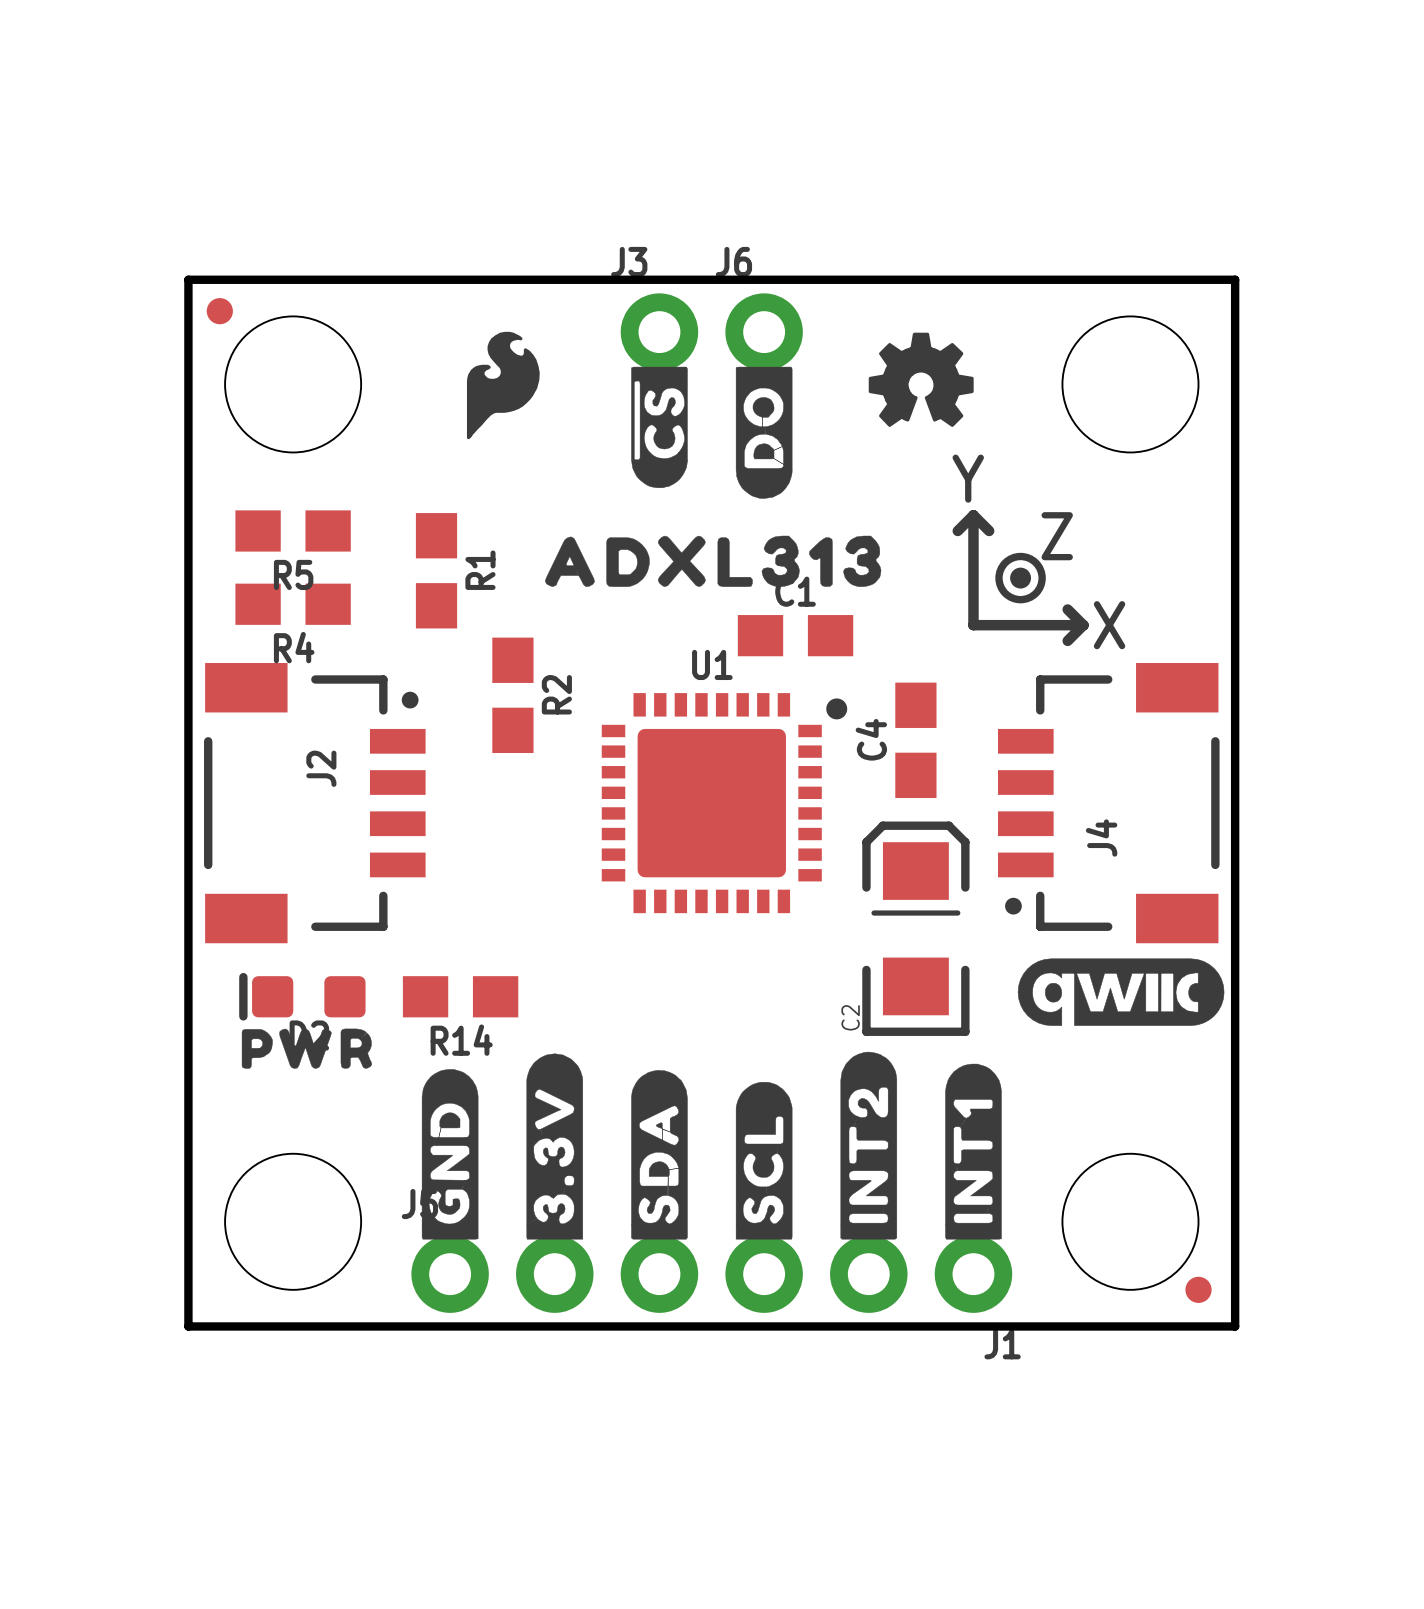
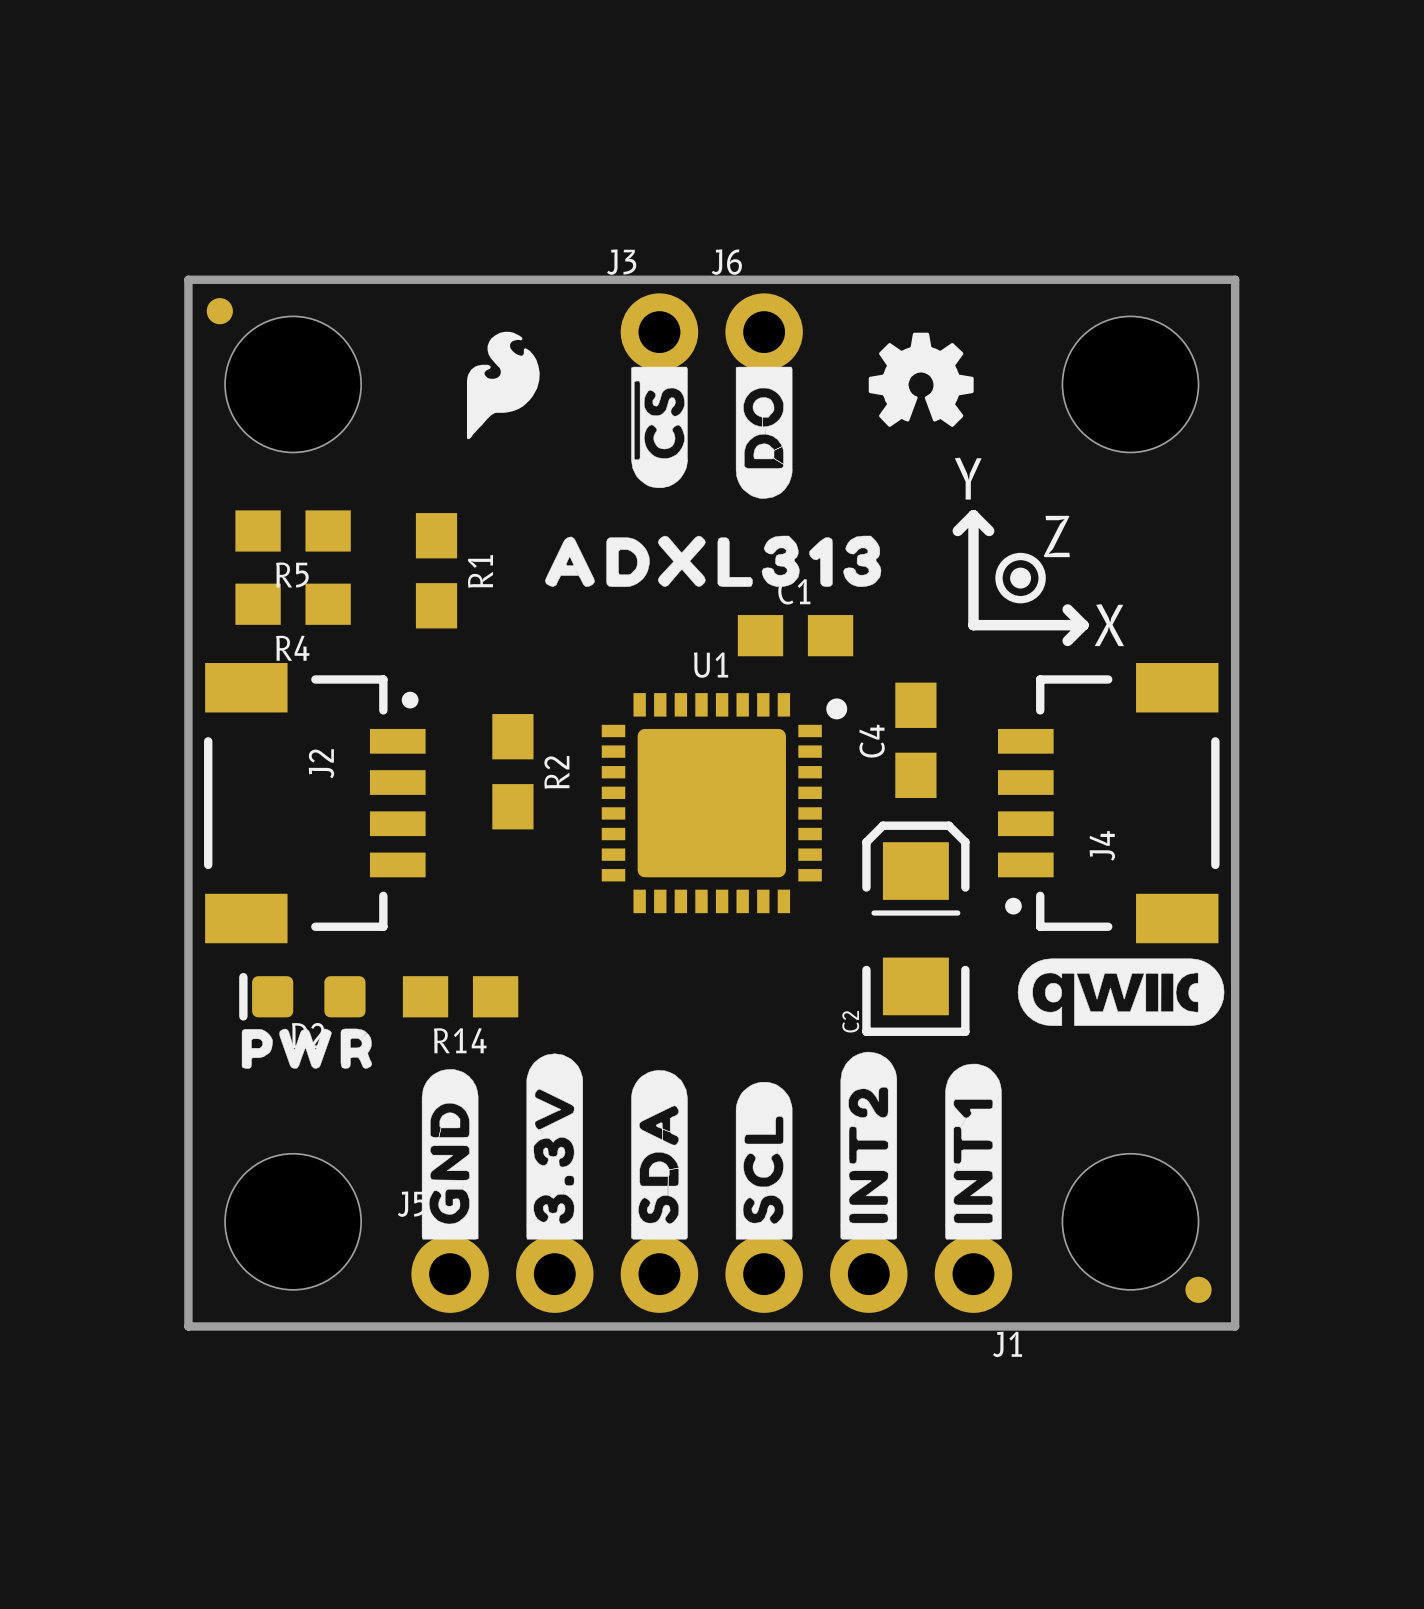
R2 position: (512, 695) -> (512, 771)

